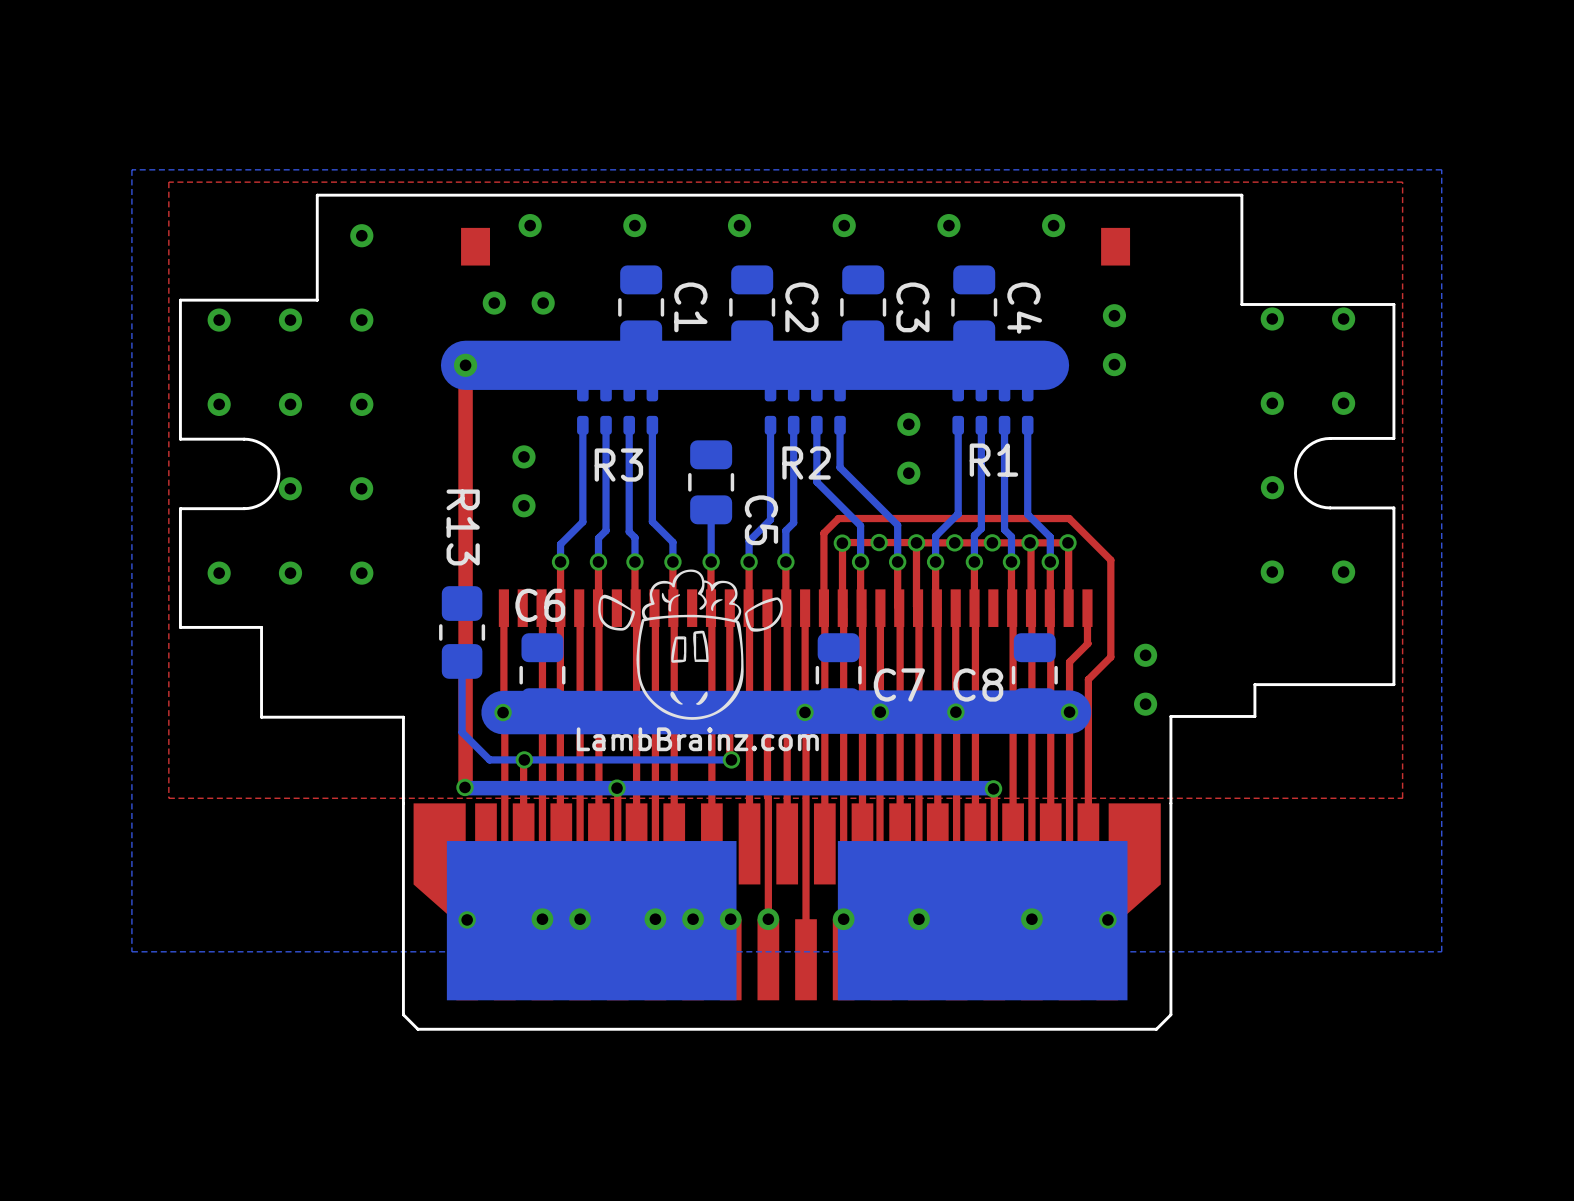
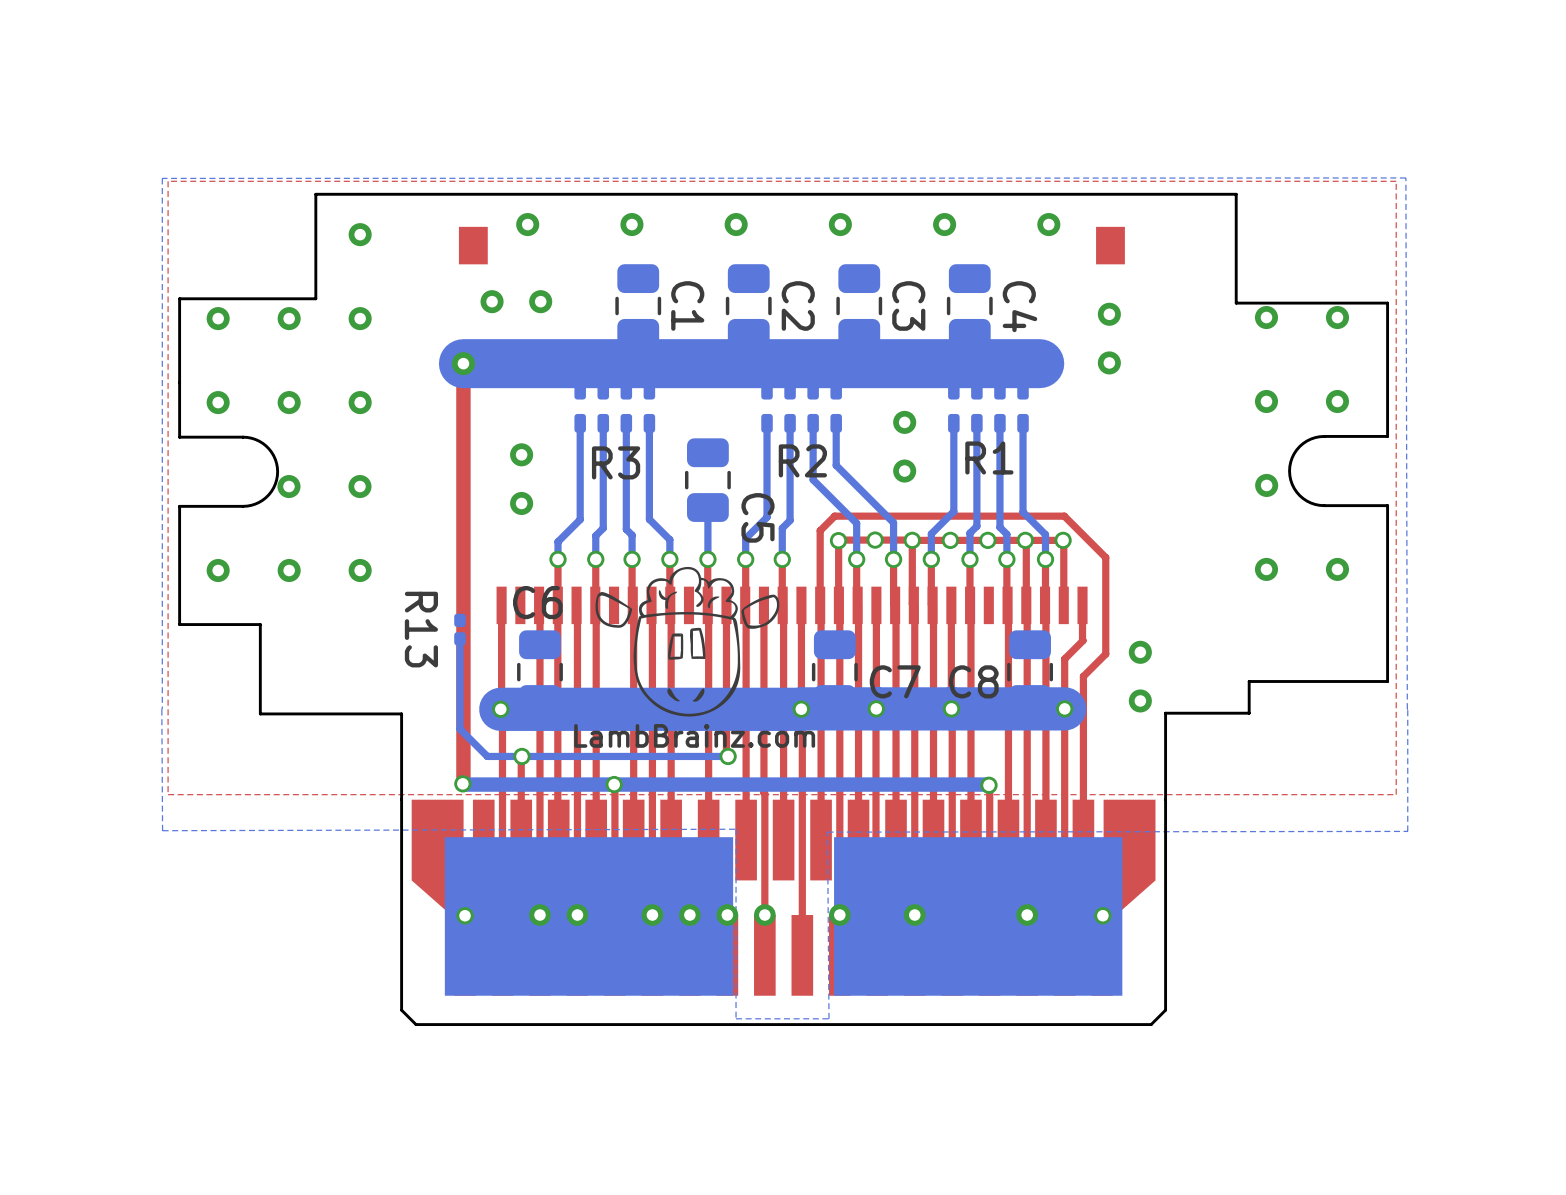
bottom zone outline: (1441, 169) (1441, 951) (131, 951) (131, 169) (1441, 169) -> (1405, 177) (1407, 831) (827, 832) (828, 1018) (736, 1018) (736, 829) (162, 830) (162, 178) (1405, 177)
R13 name position: R13 (463, 527) -> R13 (421, 629)
R13 footprint: [439, 586, 486, 679] -> [454, 613, 466, 646]
bottom track: none -> (459, 638) (459, 658)

